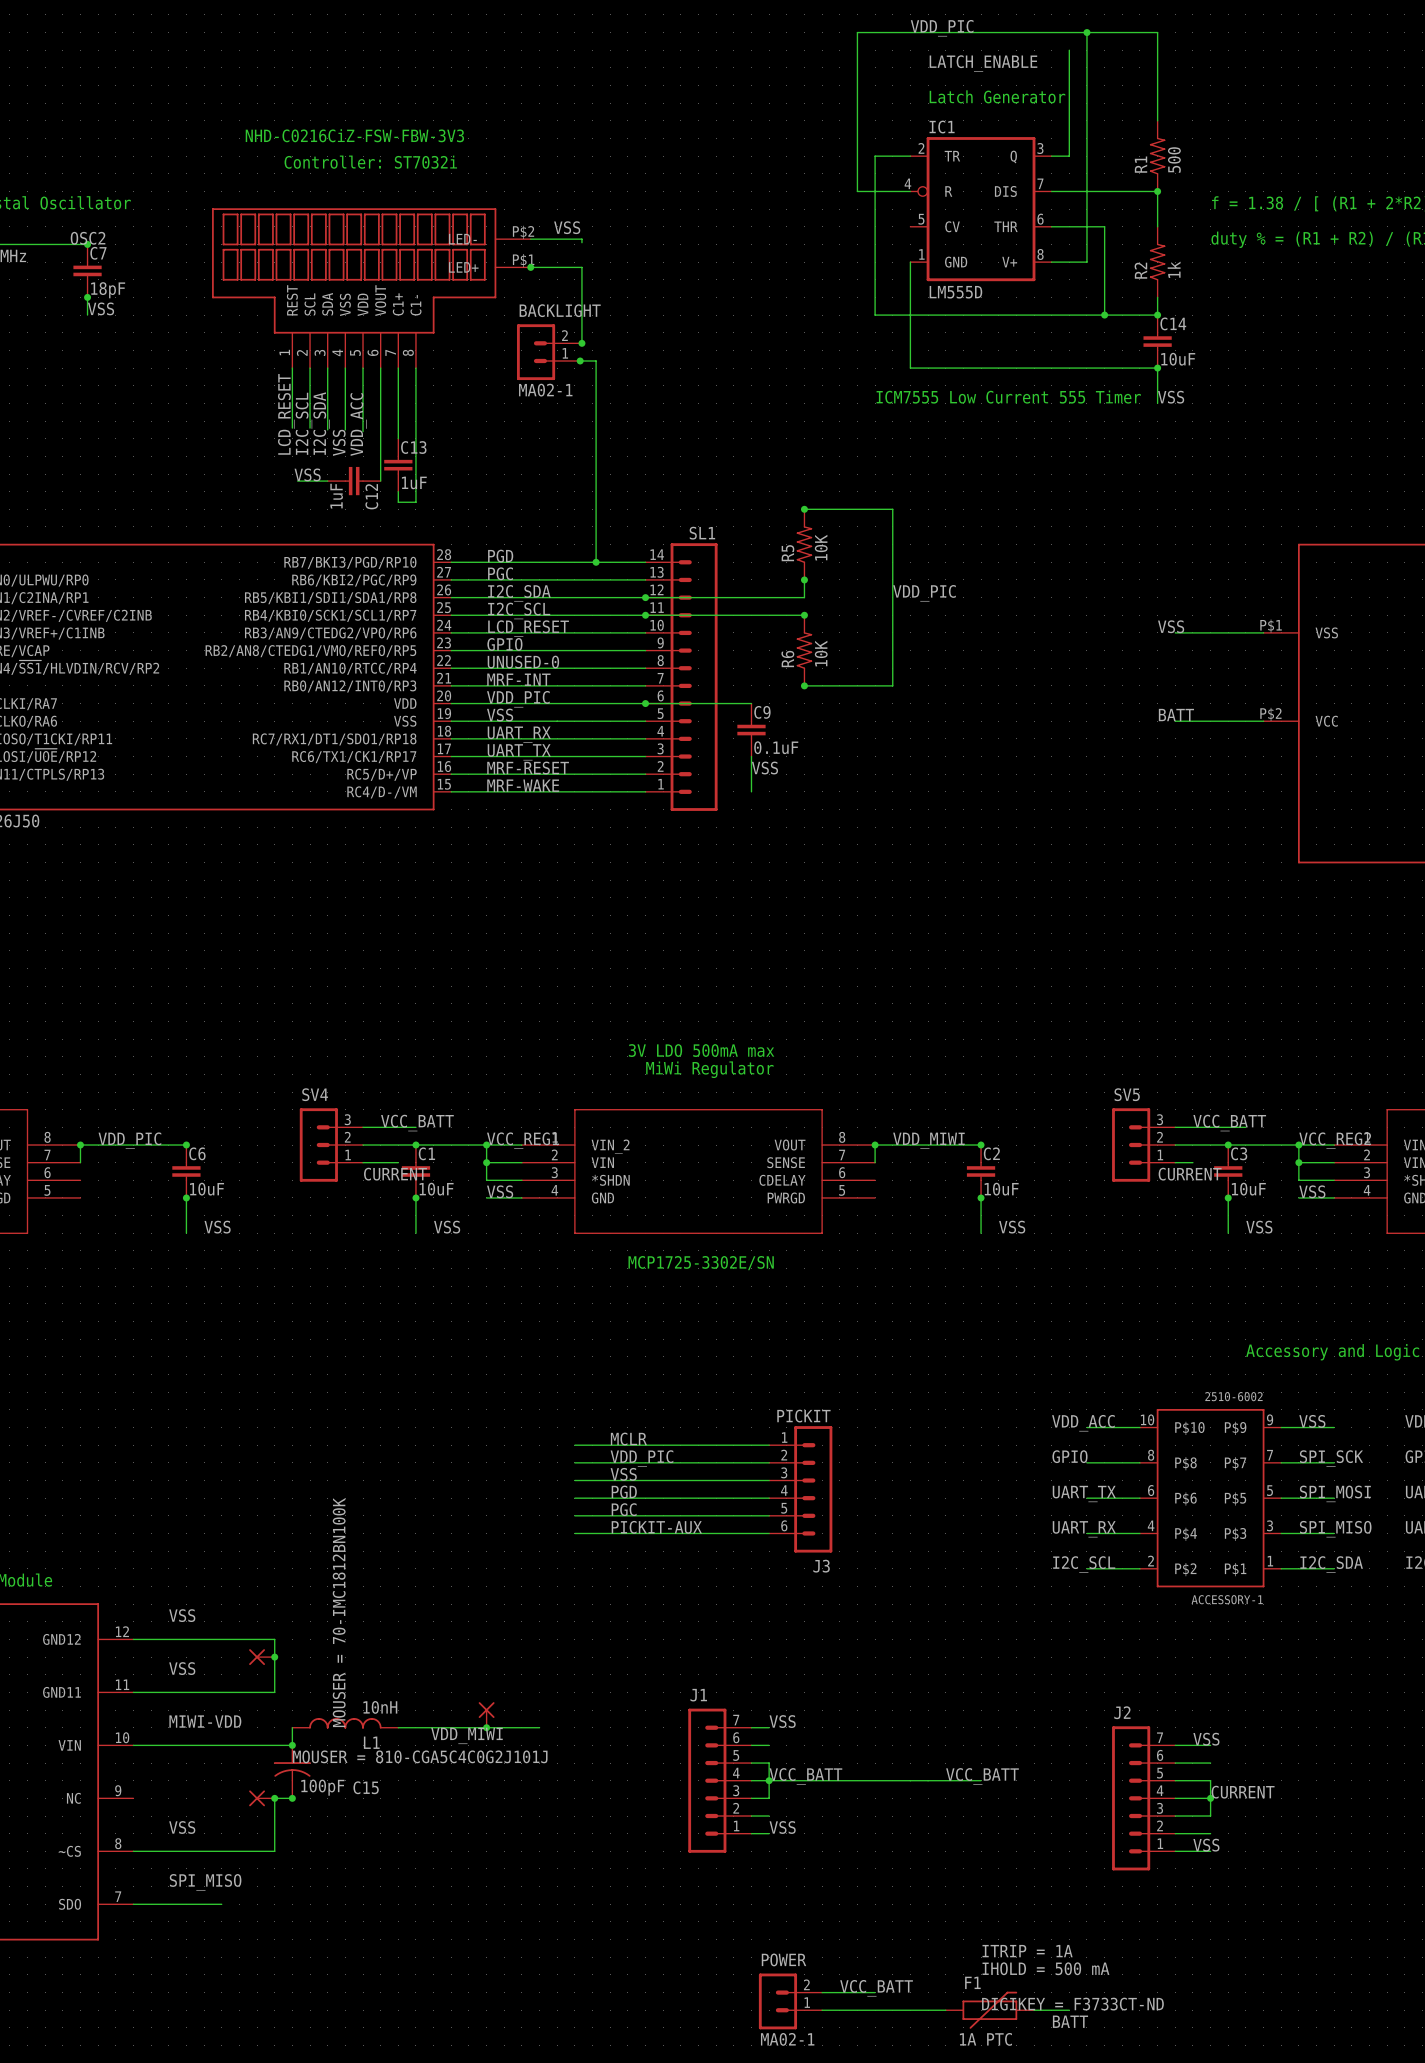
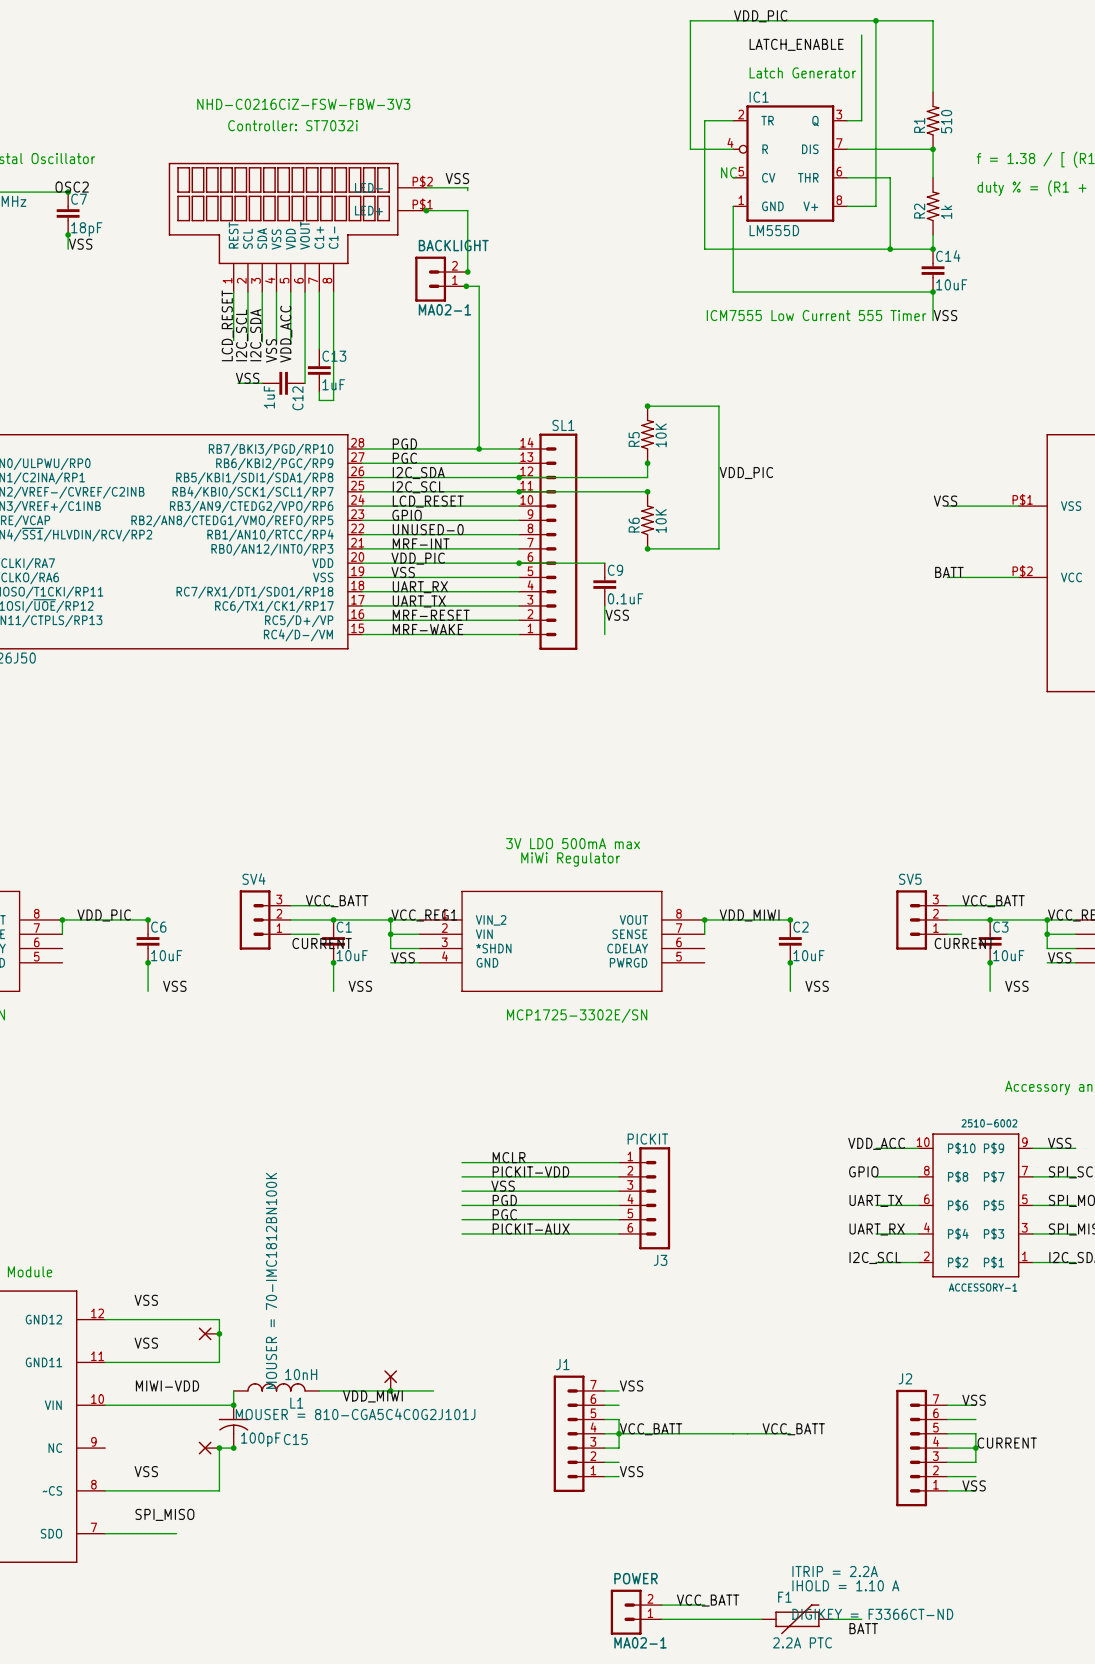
R1 value: 500 (1174, 159) -> 510 (946, 121)
text: none -> NC (728, 172)
label: VDD_PIC (641, 1458) -> PICKIT-VDD (530, 1171)
F1 text: ITRIP = 1A (1027, 1951) -> ITRIP = 2.2A (835, 1571)
F1 text: IHOLD = 500 mA (1045, 1968) -> IHOLD = 1.10 A (845, 1585)
F1 text: DIGIKEY = F3733CT-ND (1072, 2004) -> DIGIKEY = F3366CT-ND (872, 1614)
F1 value: 1A PTC (985, 2039) -> 2.2A PTC (802, 1642)

